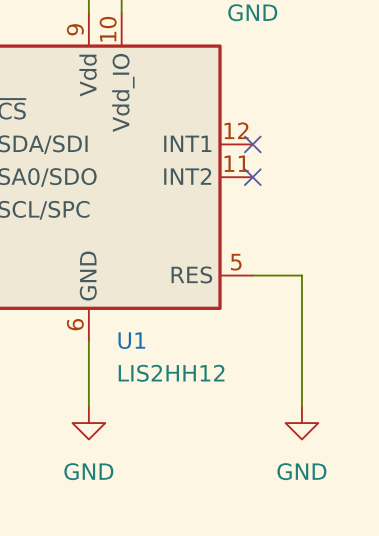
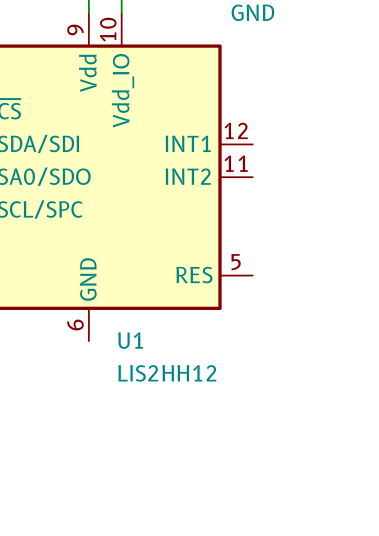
no-connect mark: (252, 144) -> none
no-connect mark: (252, 177) -> none
wire: (252, 275) (301, 275) (301, 406) -> none
wire: (88, 341) (88, 406) -> none
power symbol: GND (88, 423) -> none
power symbol: GND (301, 423) -> none

